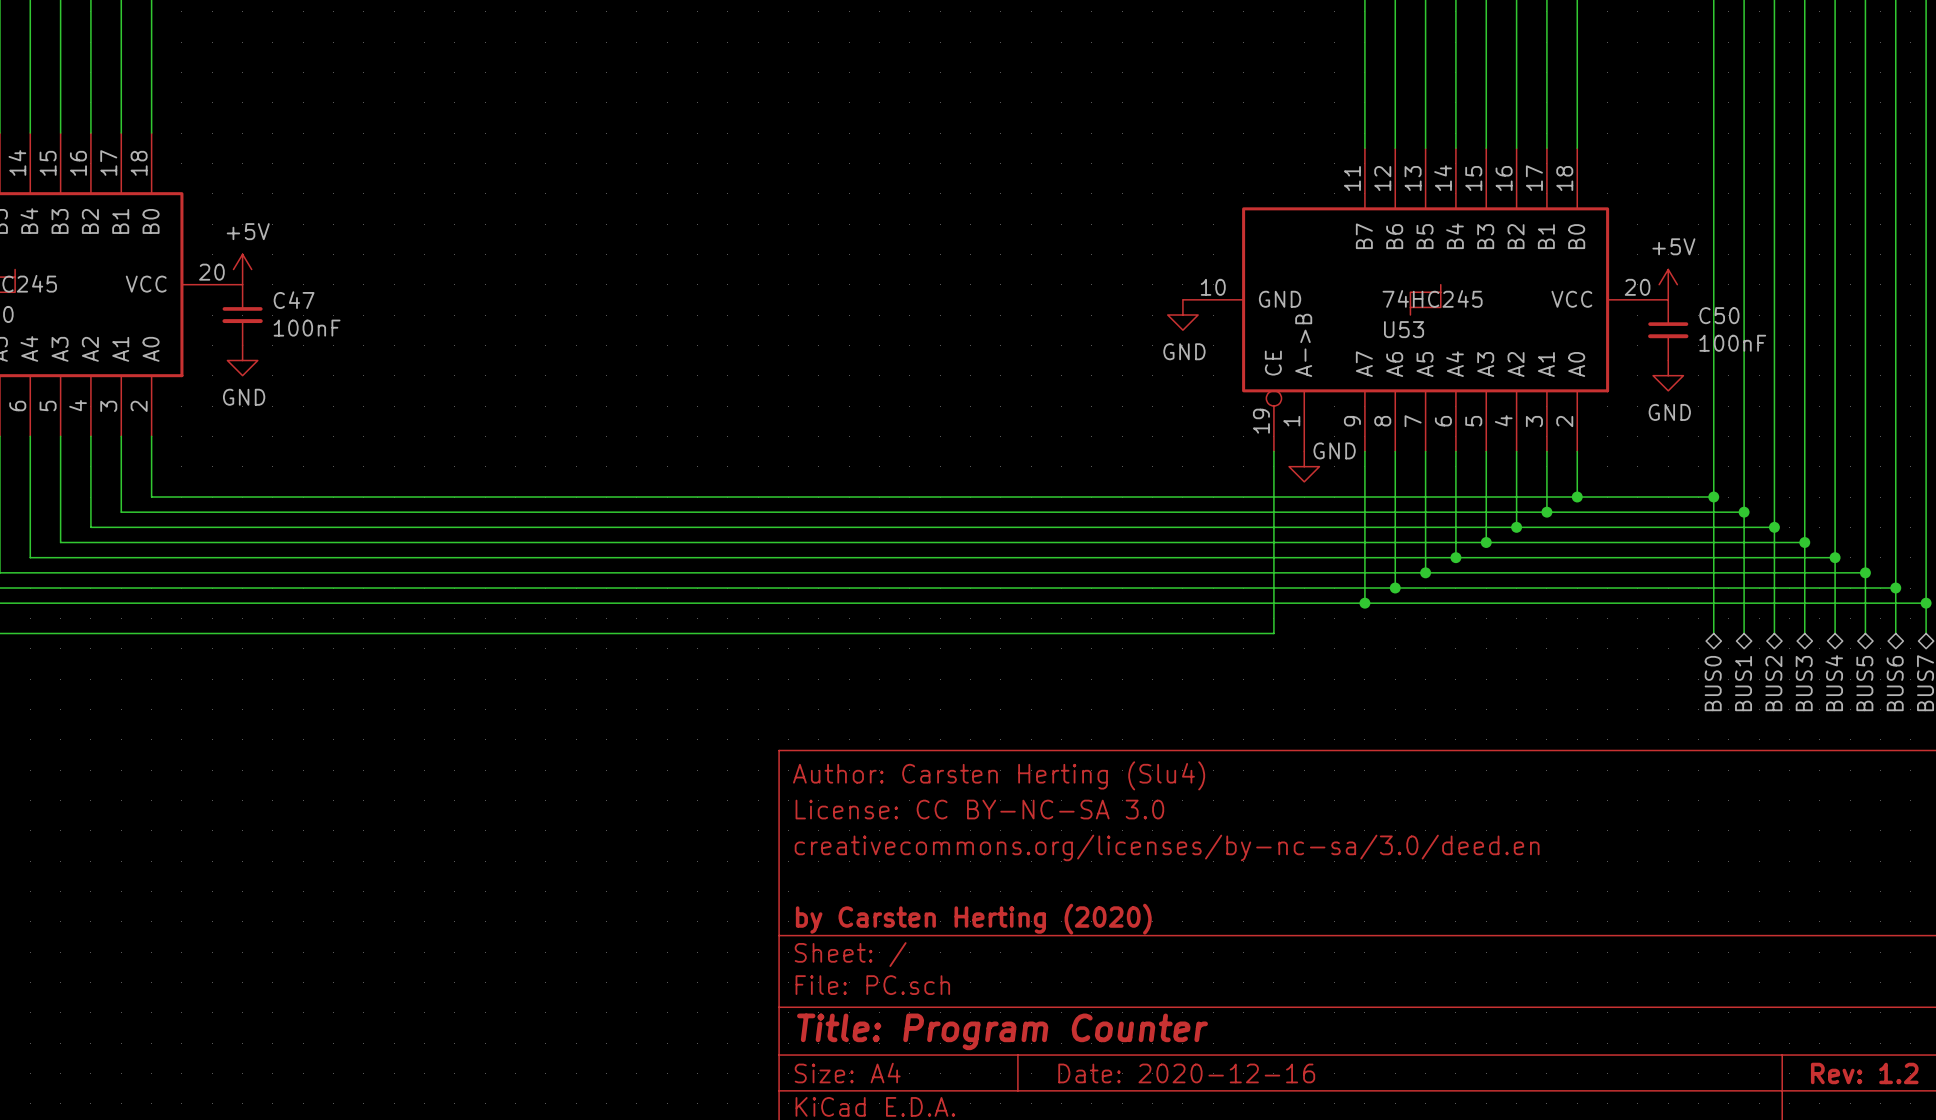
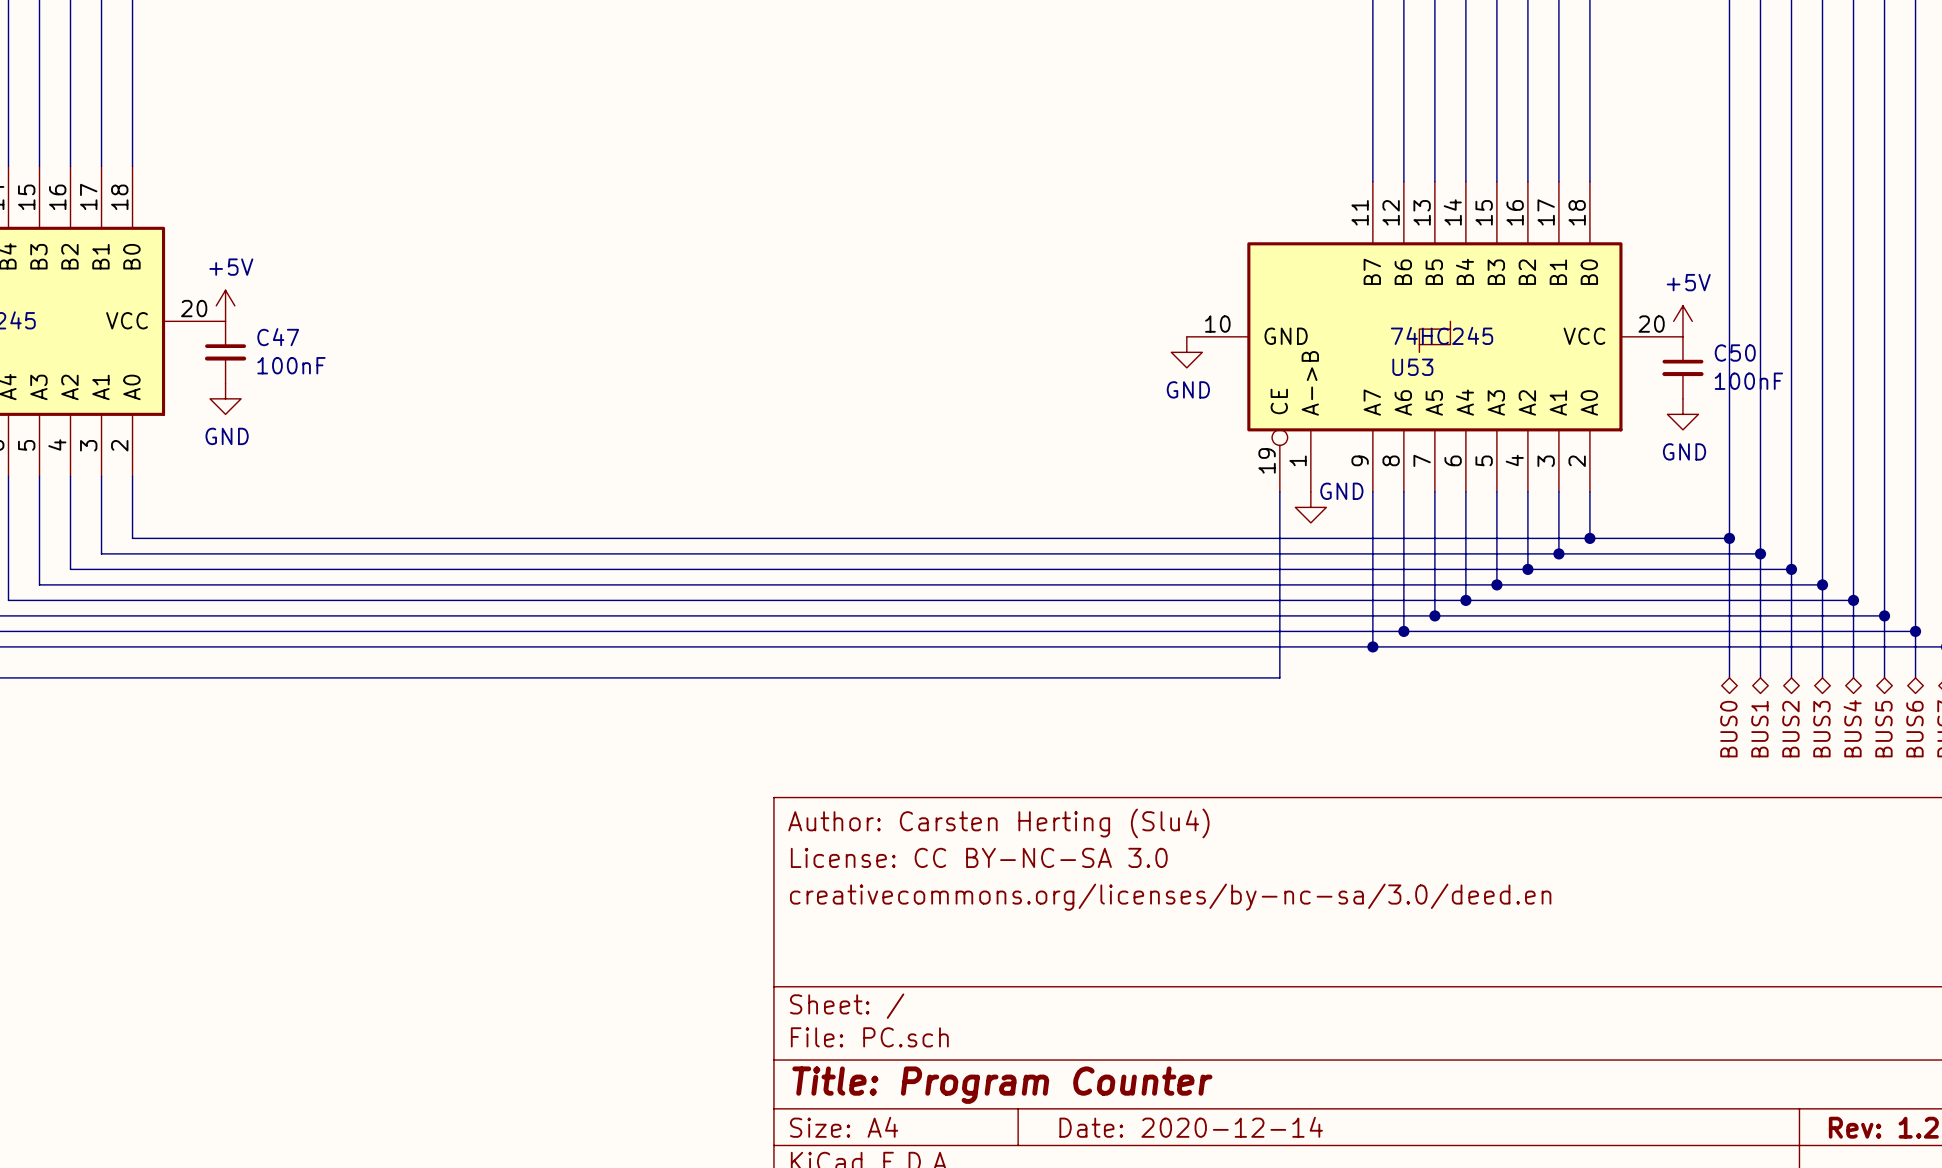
title block: by Carsten Herting (2020) (973, 919) -> none
title block: Date: 2020-12-16 (1186, 1073) -> Date: 2020-12-14 (1191, 1127)

